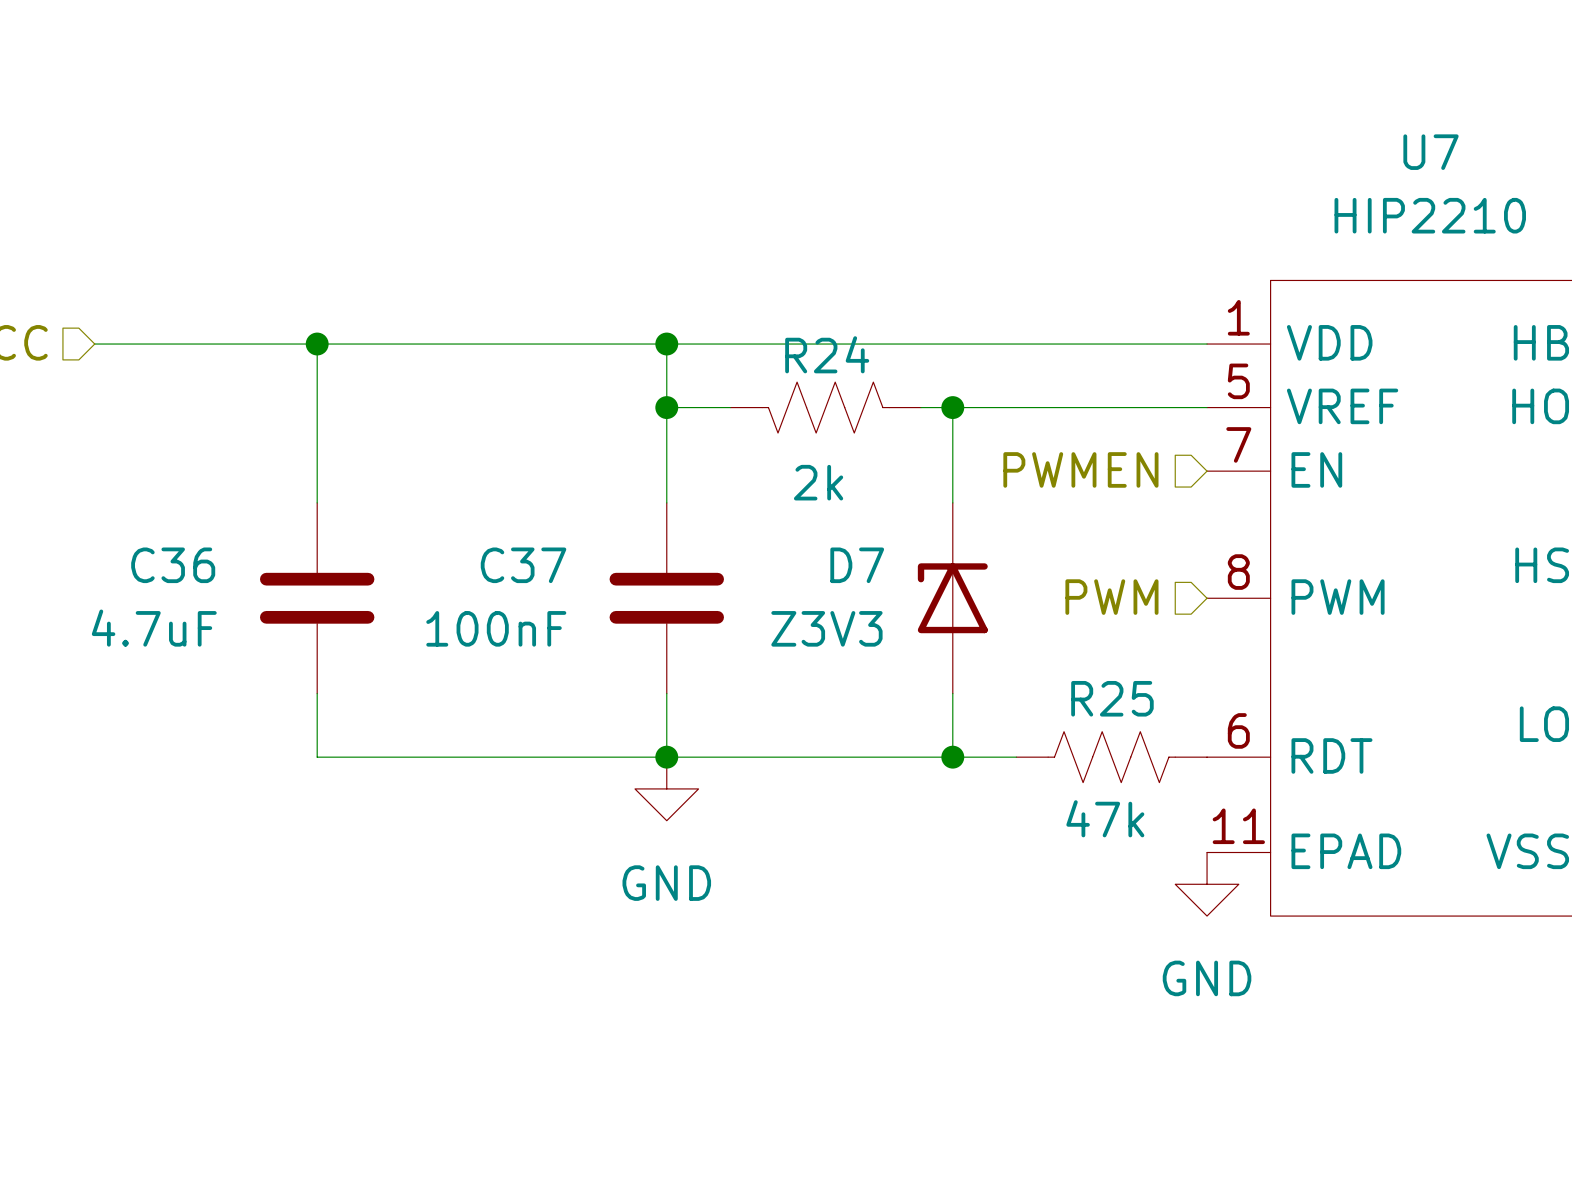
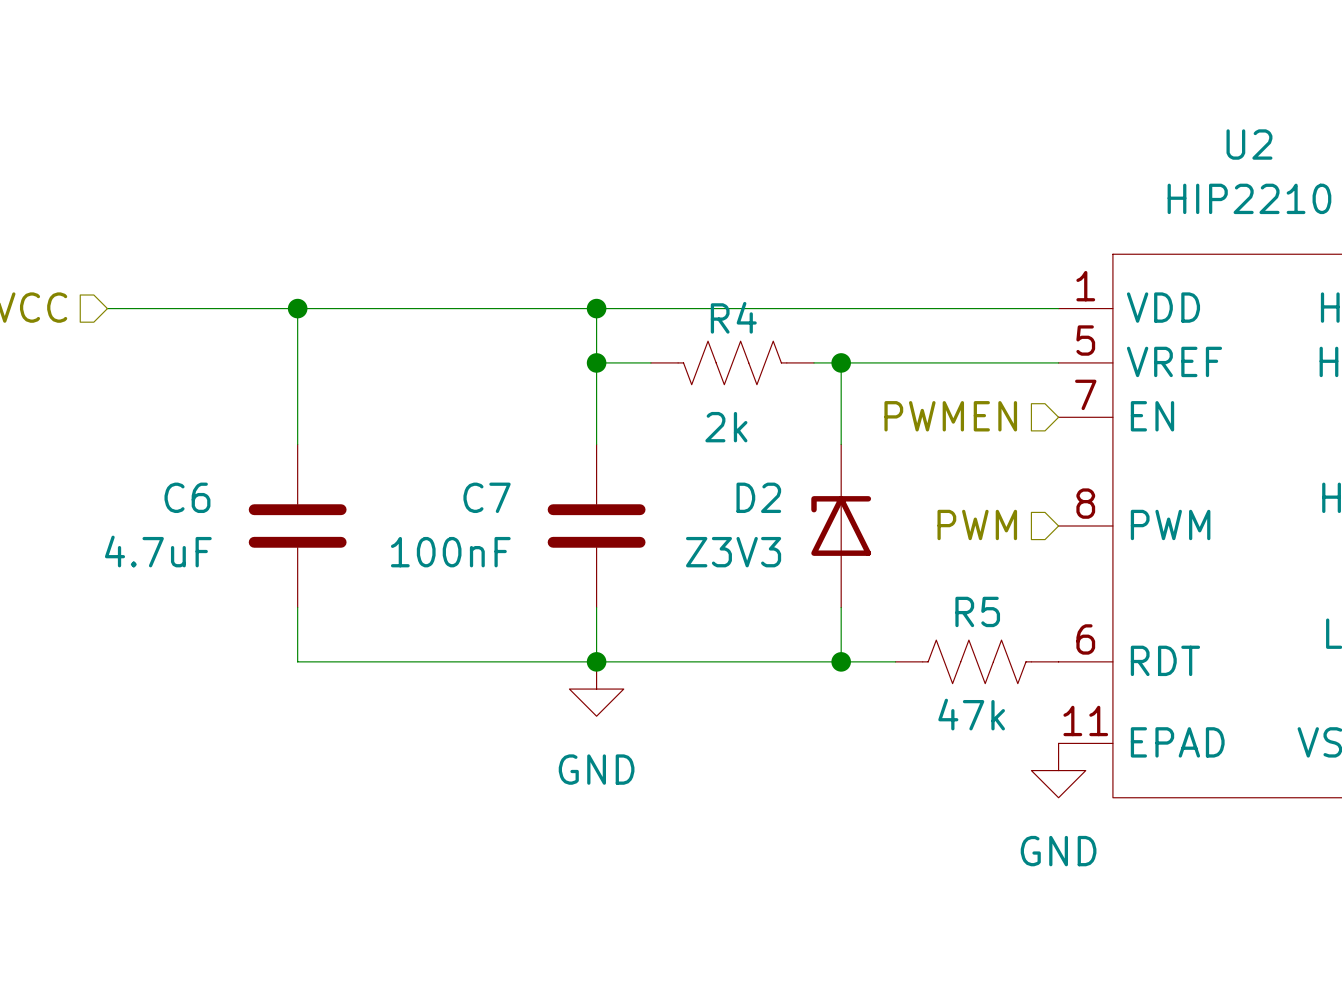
U7 name: U7 (1431, 152) -> U2 (1249, 144)
R24 name: R24 (827, 354) -> R4 (733, 317)
C36 name: C36 (173, 565) -> C6 (187, 497)
C37 name: C37 (523, 565) -> C7 (487, 497)
D7 name: D7 (857, 565) -> D2 (758, 497)
R25 name: R25 (1112, 698) -> R5 (977, 611)

